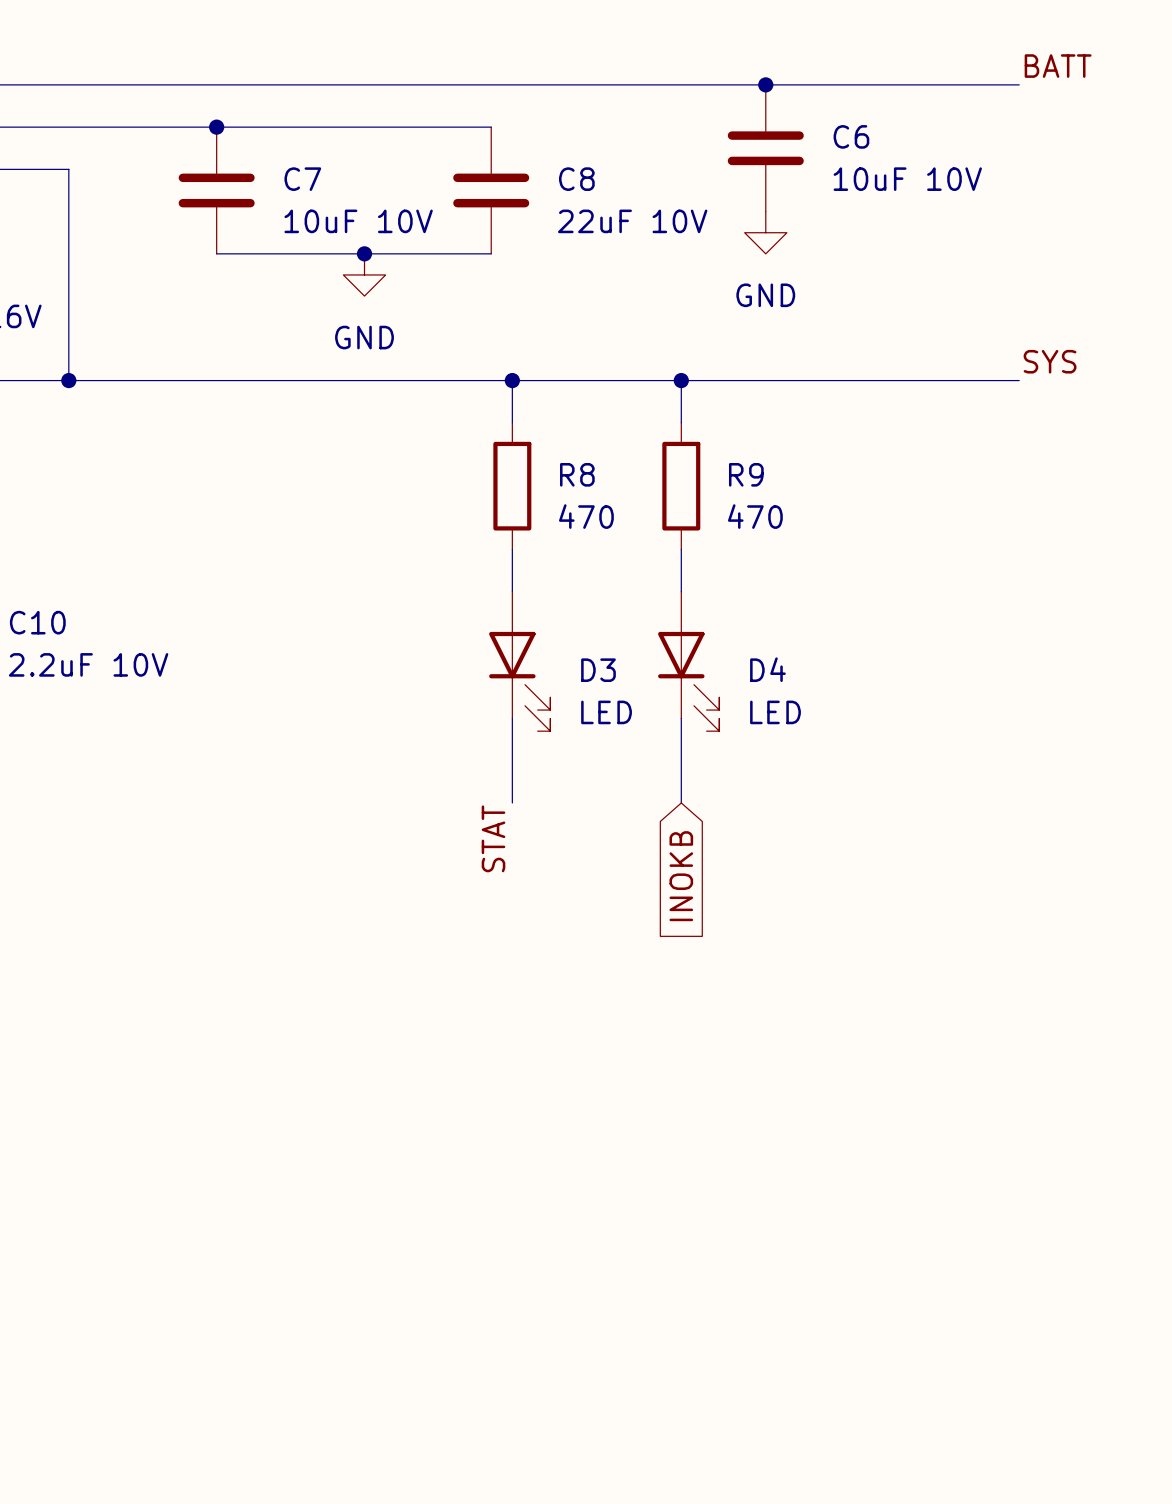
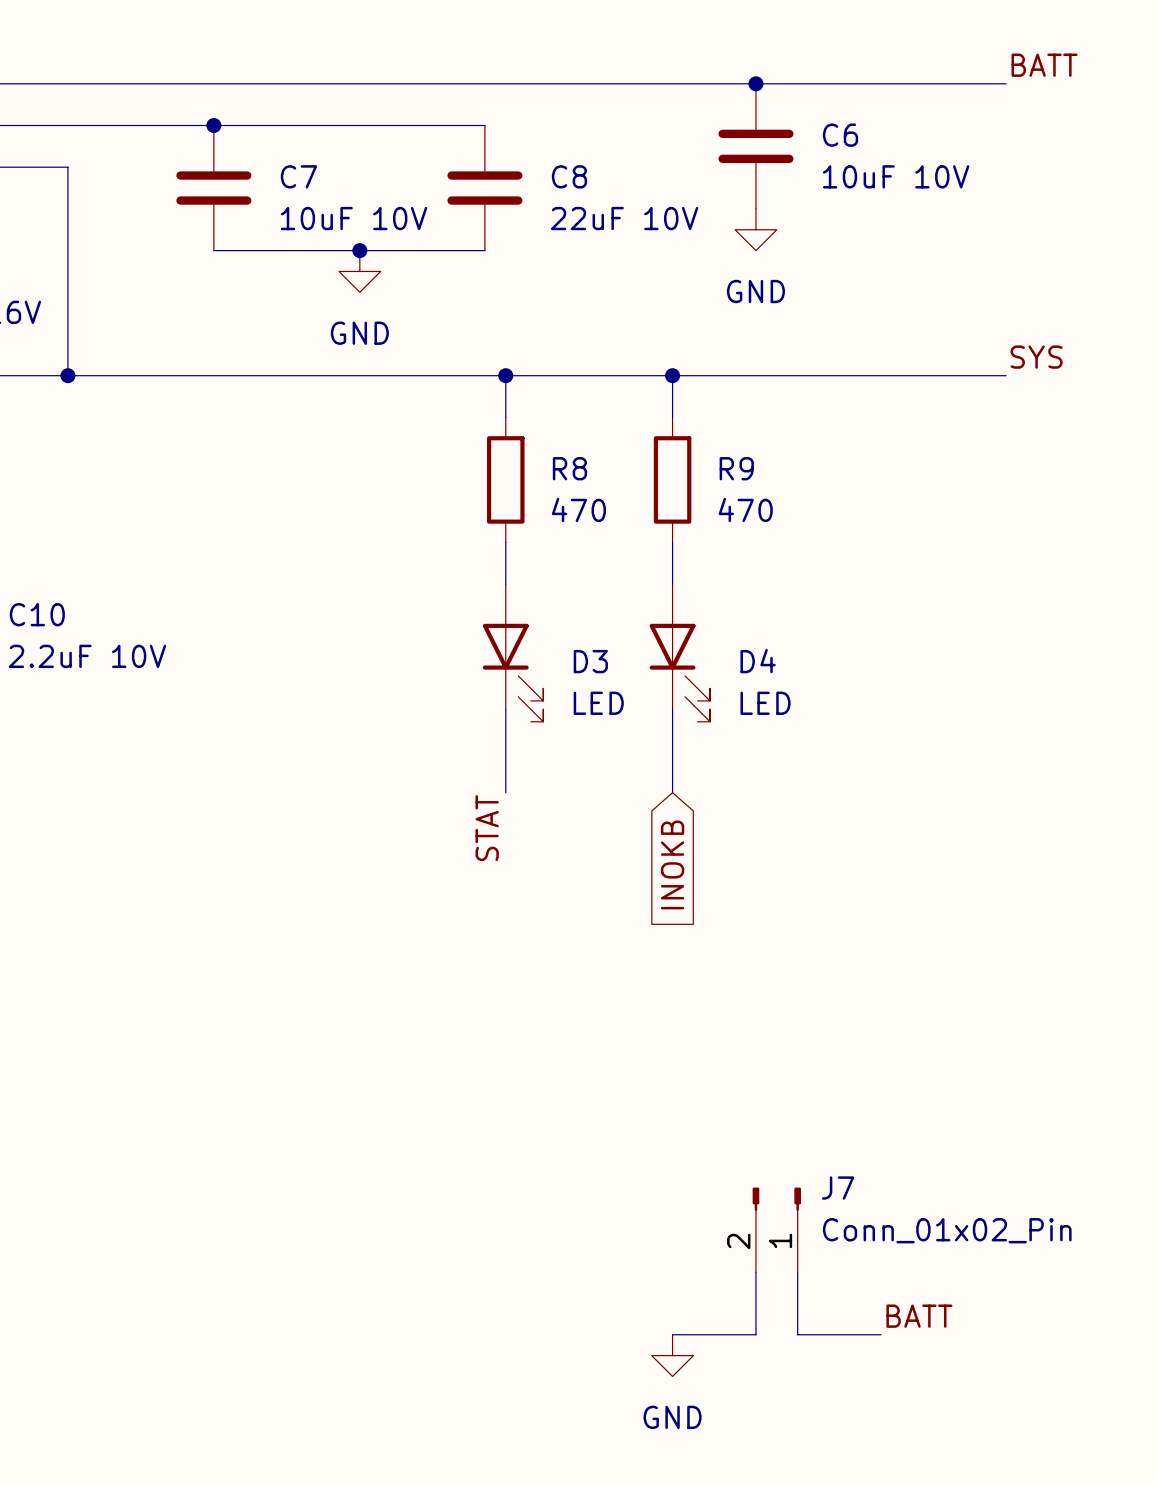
J7: none -> Conn_01x02_Pin (776, 1229)
wire: none -> (755, 1272) (755, 1334) (672, 1334)
wire: none -> (797, 1272) (797, 1334) (881, 1334)
label: none -> BATT (919, 1316)
power symbol: none -> GND (672, 1355)

